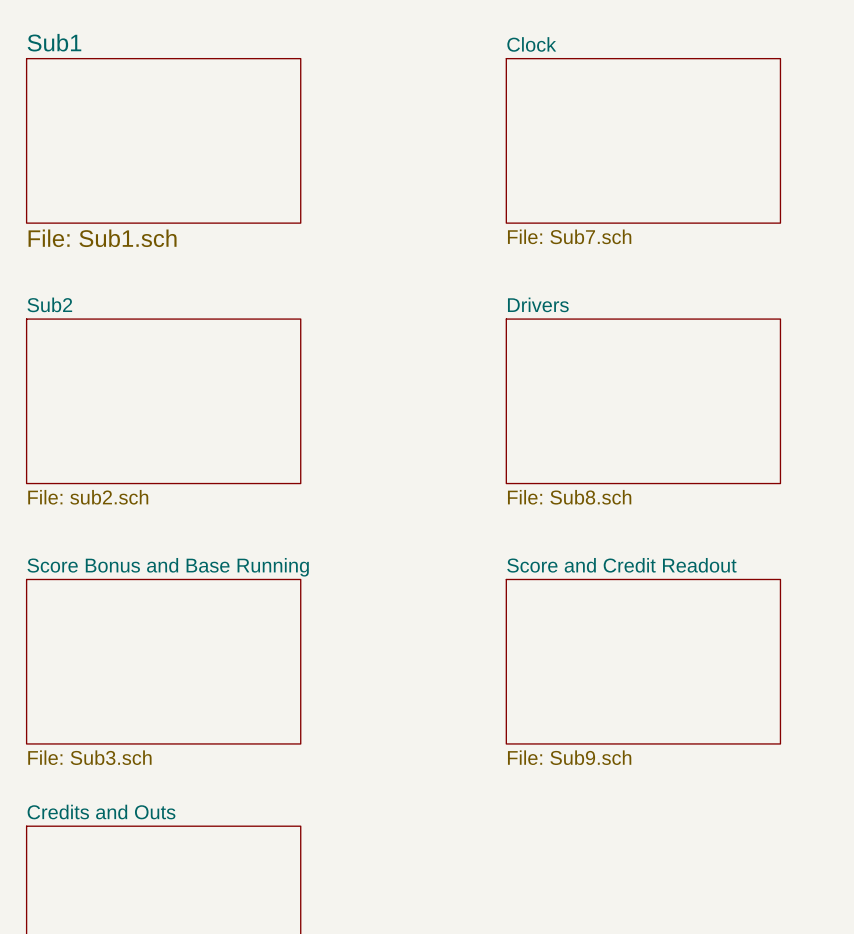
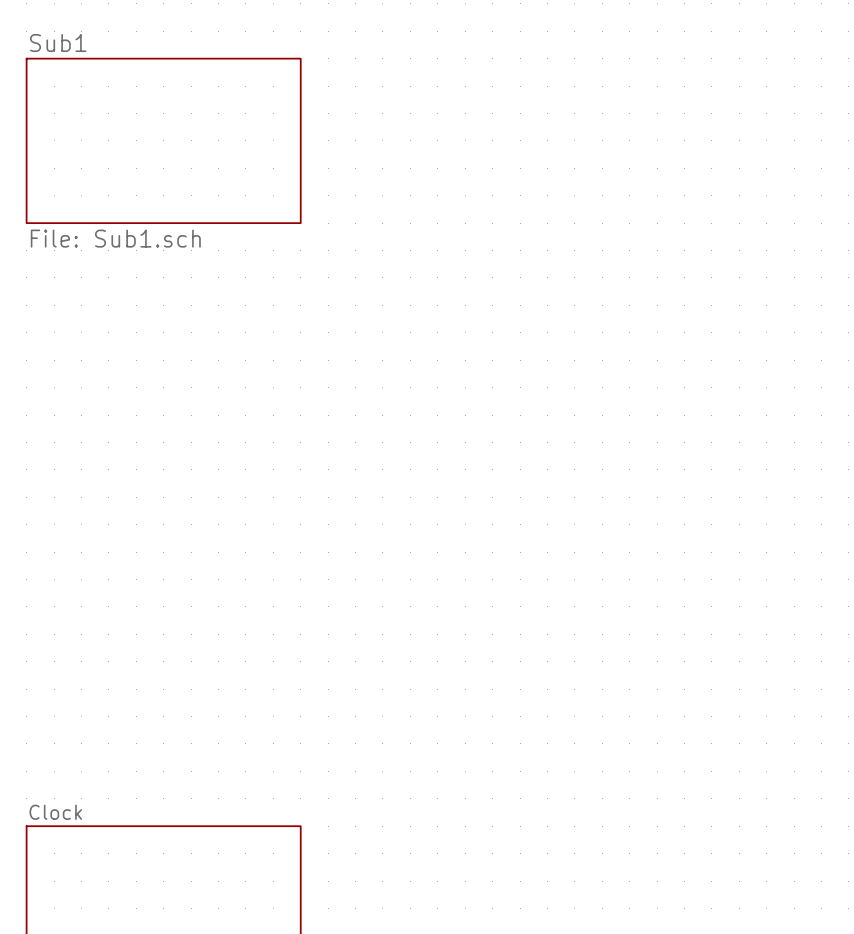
sheet Clock: File: Sub7.sch (643, 140) -> none
sheet Sub2: File: sub2.sch (163, 401) -> none
sheet Drivers: File: Sub8.sch (643, 401) -> none
sheet Score Bonus and Base Running: File: Sub3.sch (163, 661) -> none
sheet Score and Credit Readout: File: Sub9.sch (643, 661) -> none
sheet Credits and Outs name: Credits and Outs (101, 812) -> Clock (55, 812)

